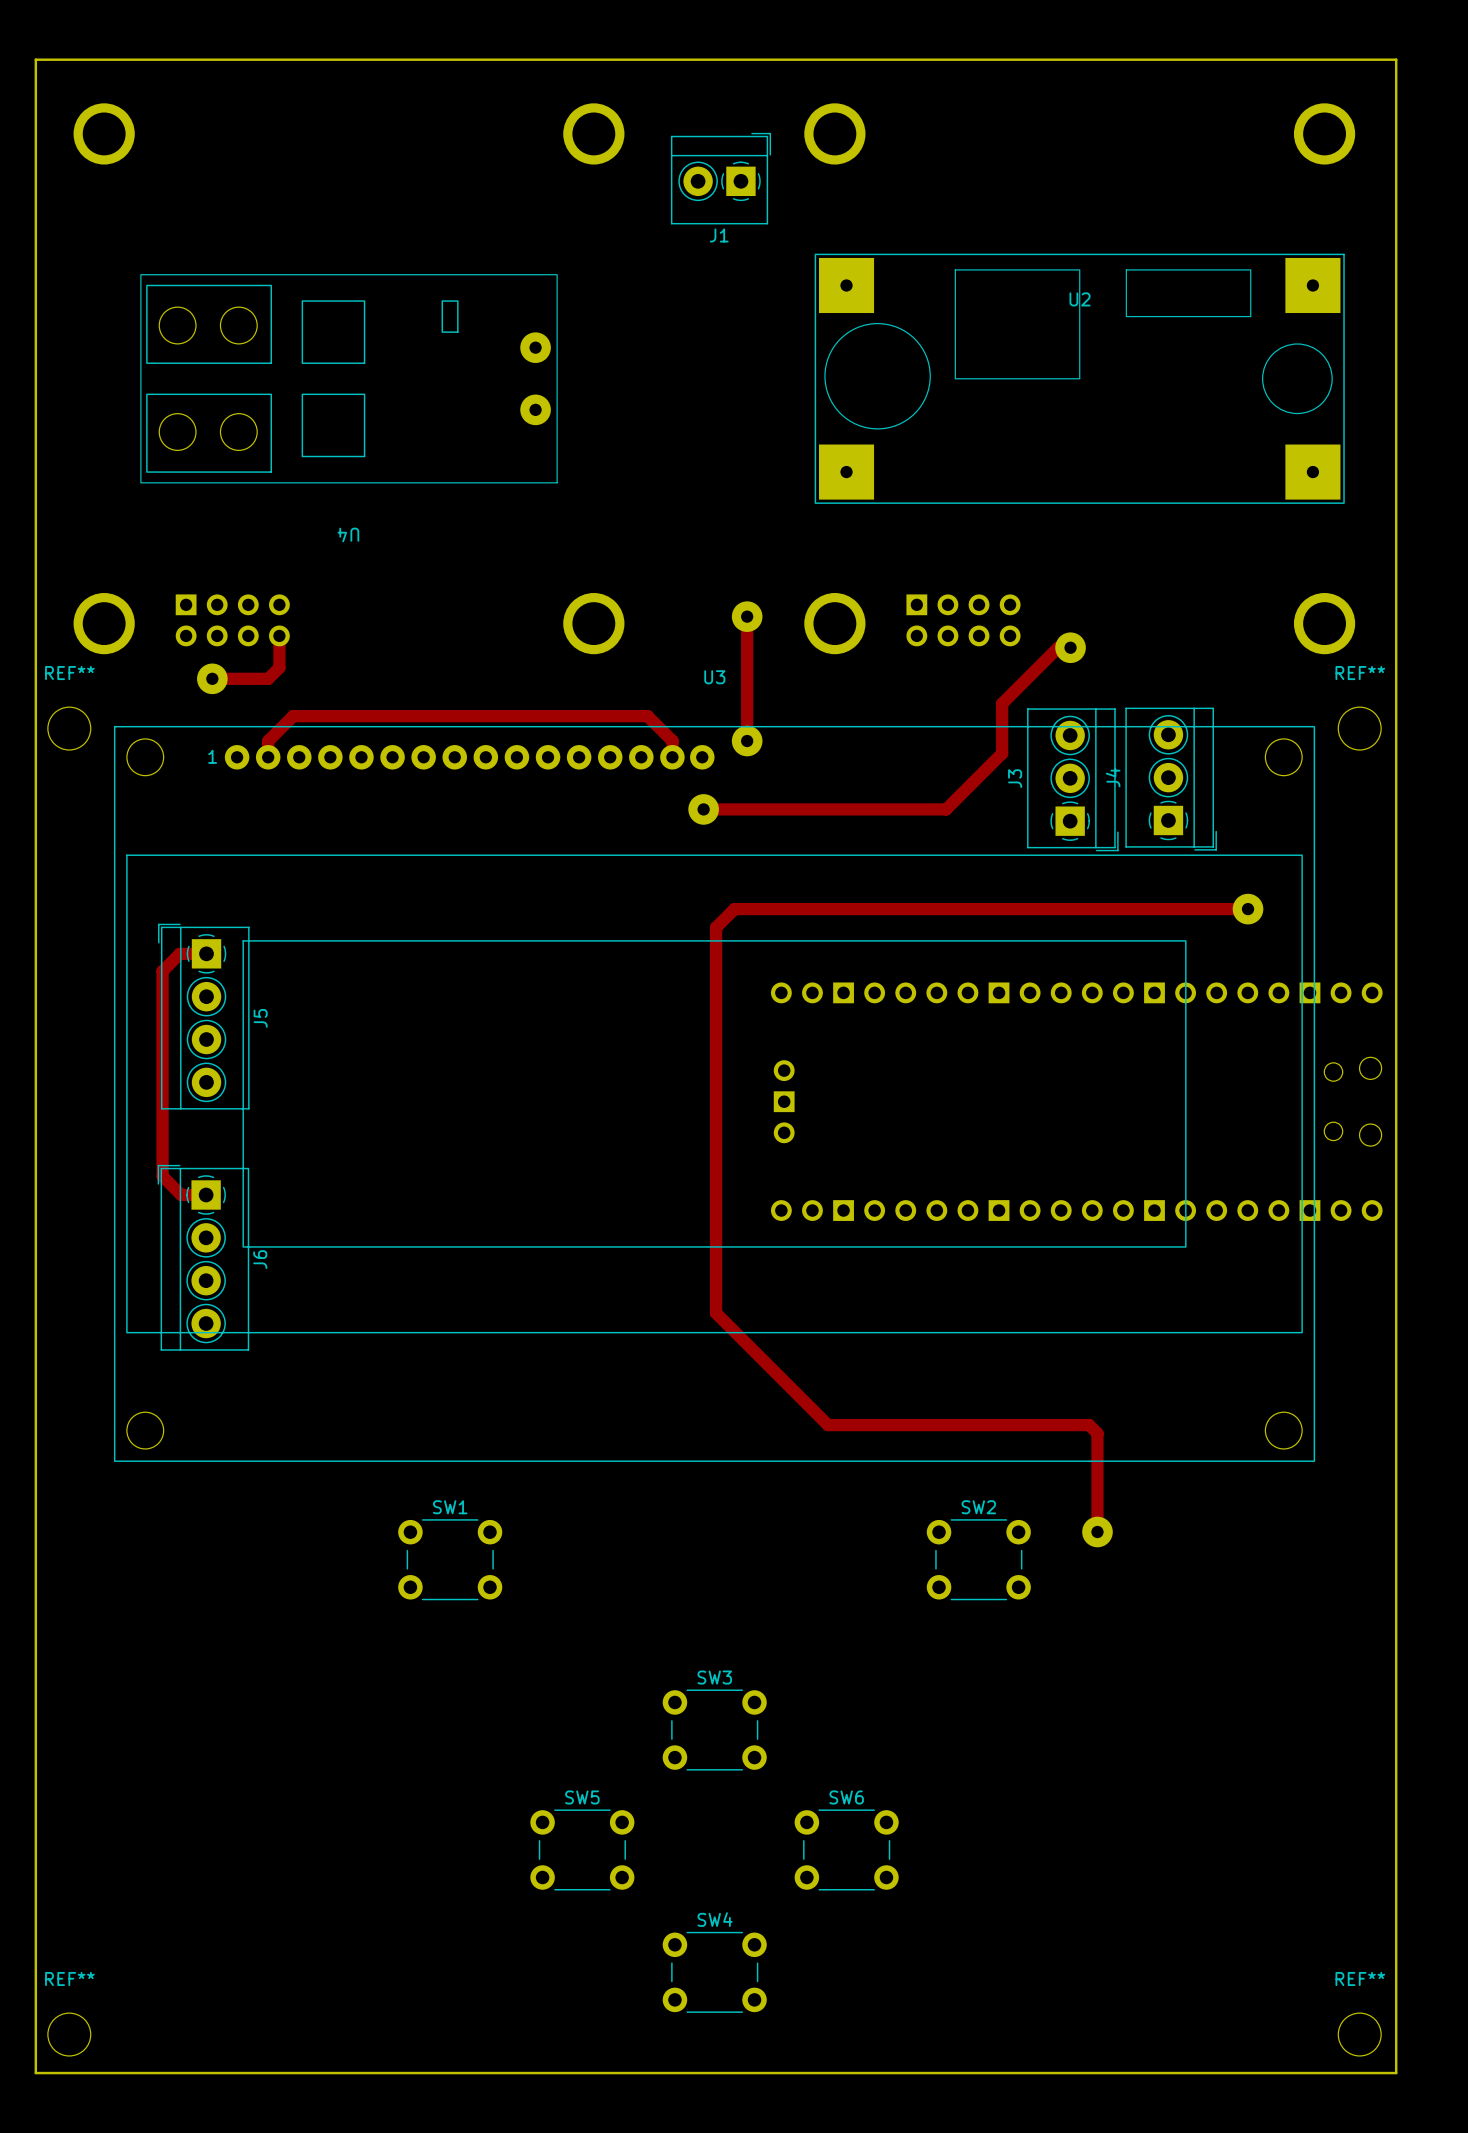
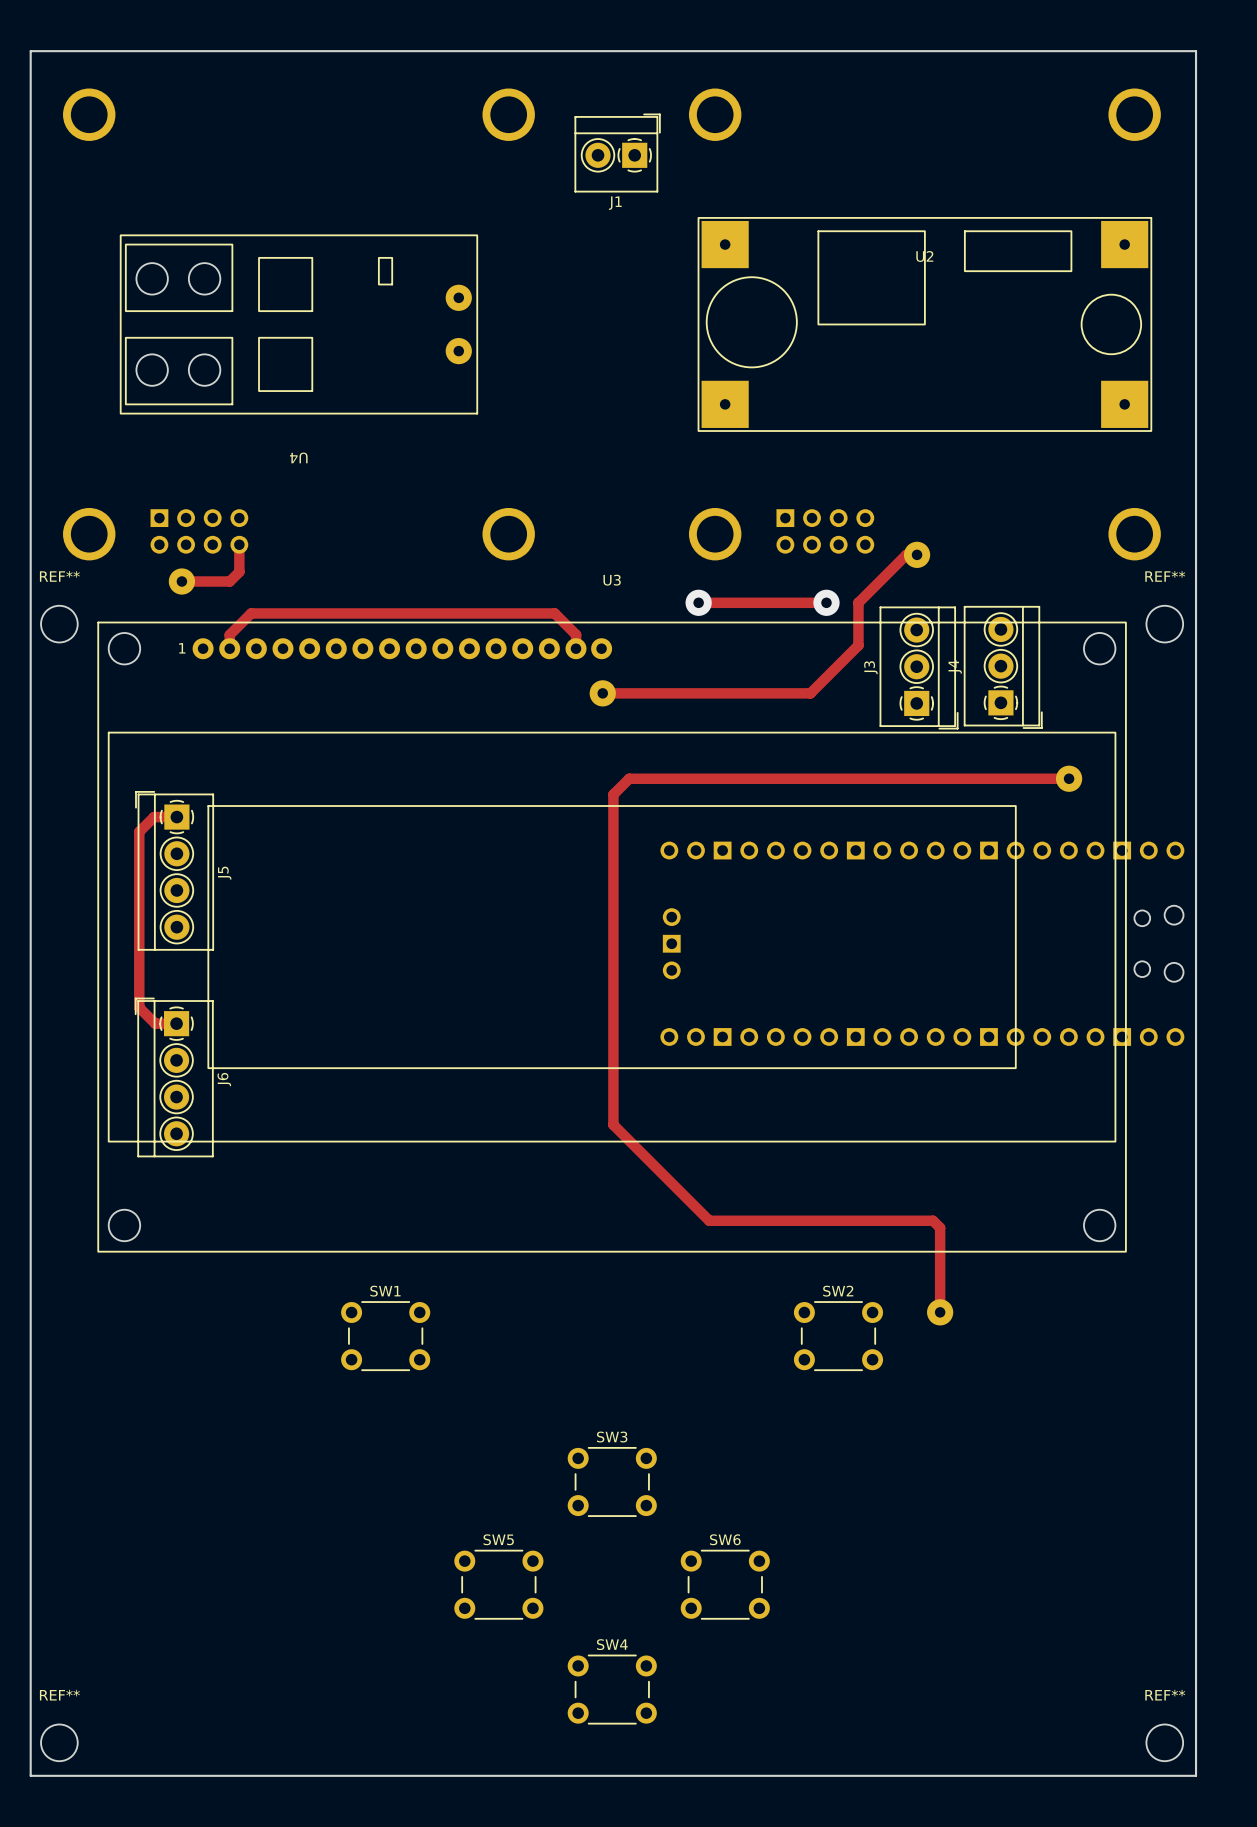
track: (747, 616) (747, 741) -> none
part: (747, 616) -> none
track: none -> (698, 602) (826, 602)
via: none -> (698, 602)
via: none -> (826, 602)
part: (747, 741) -> none

